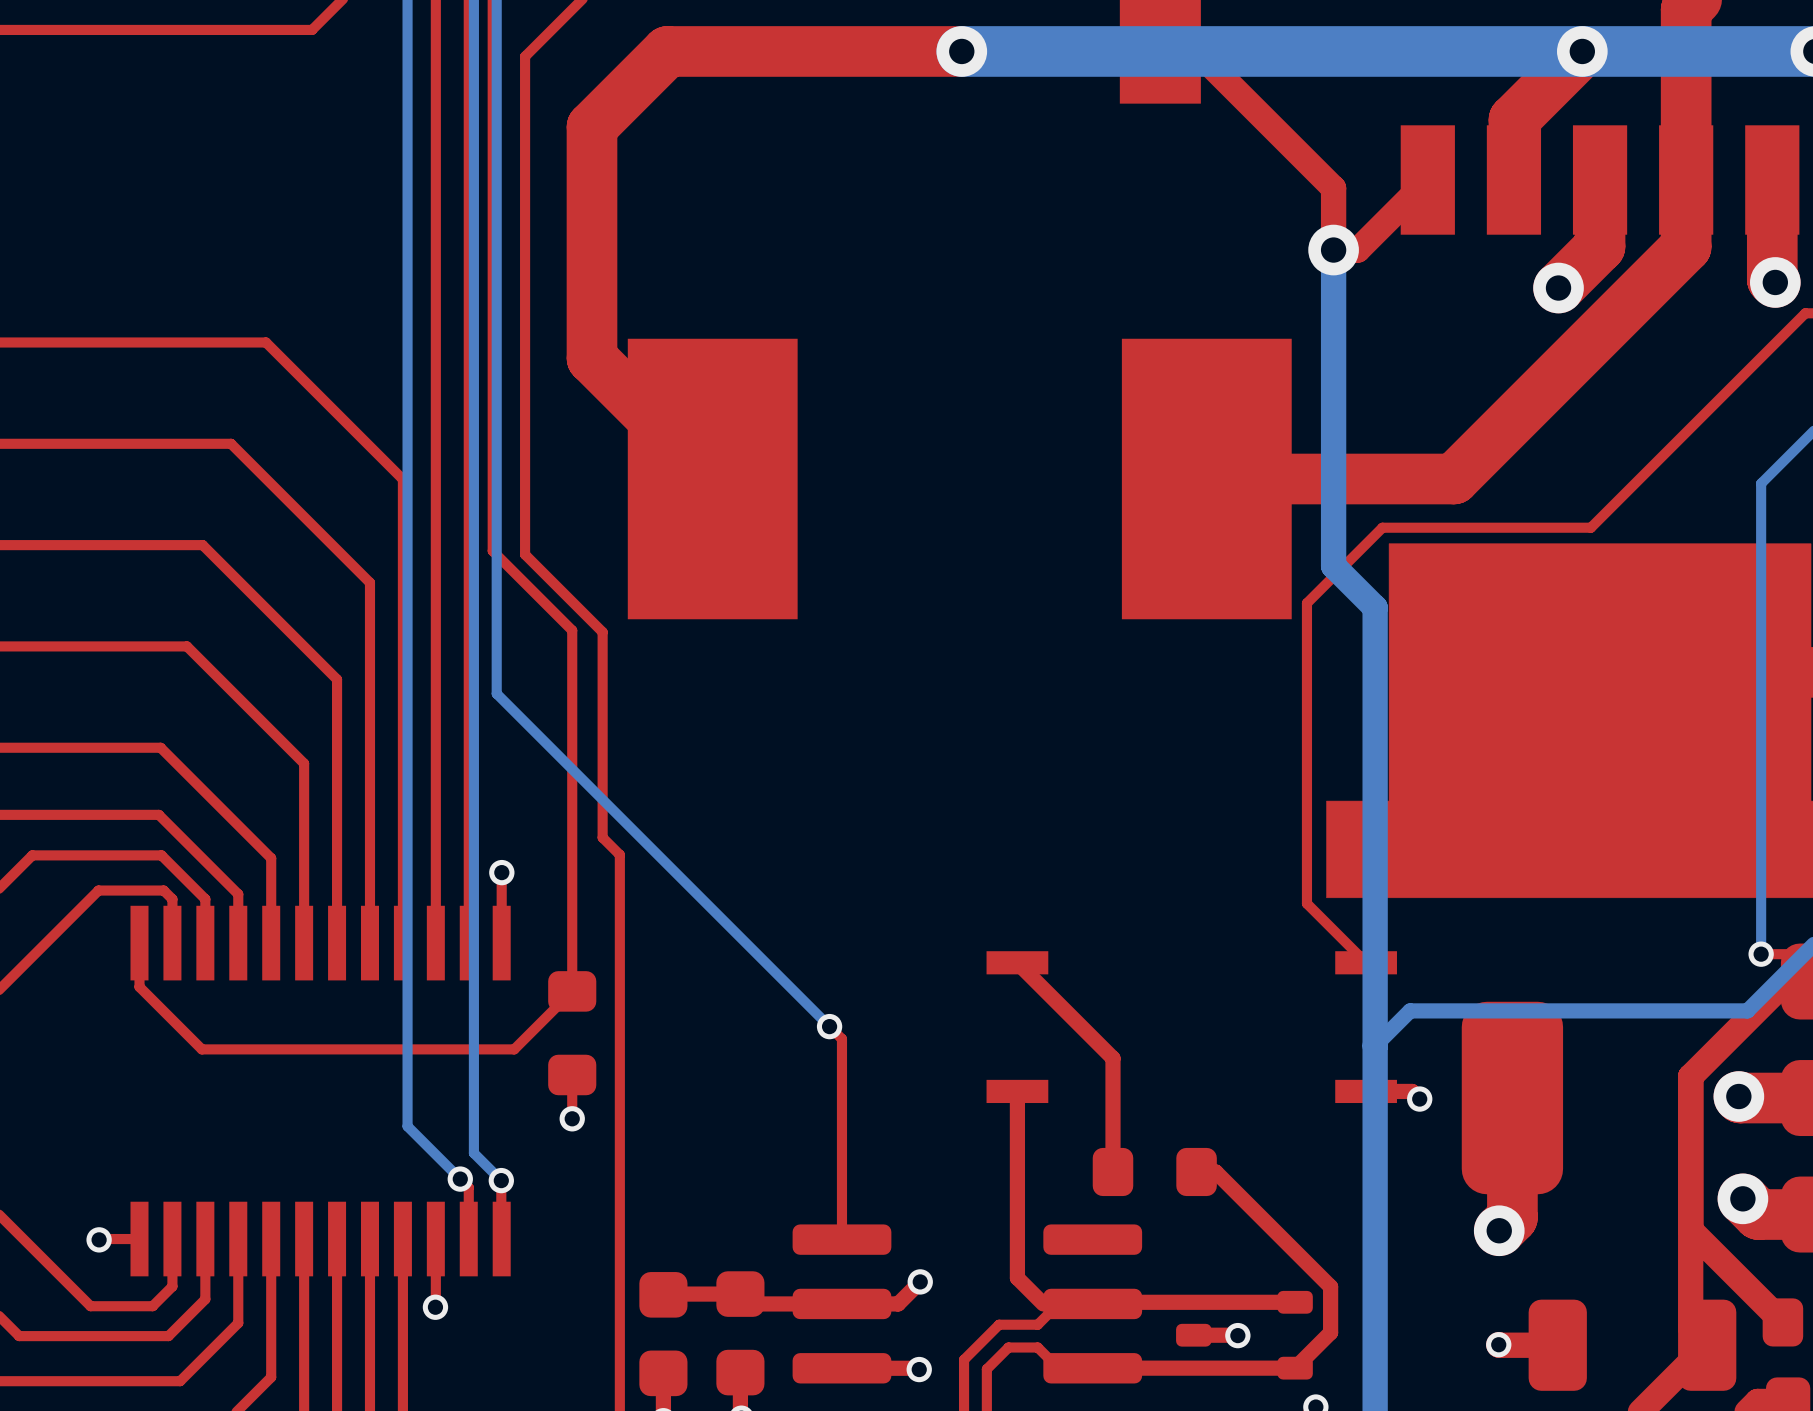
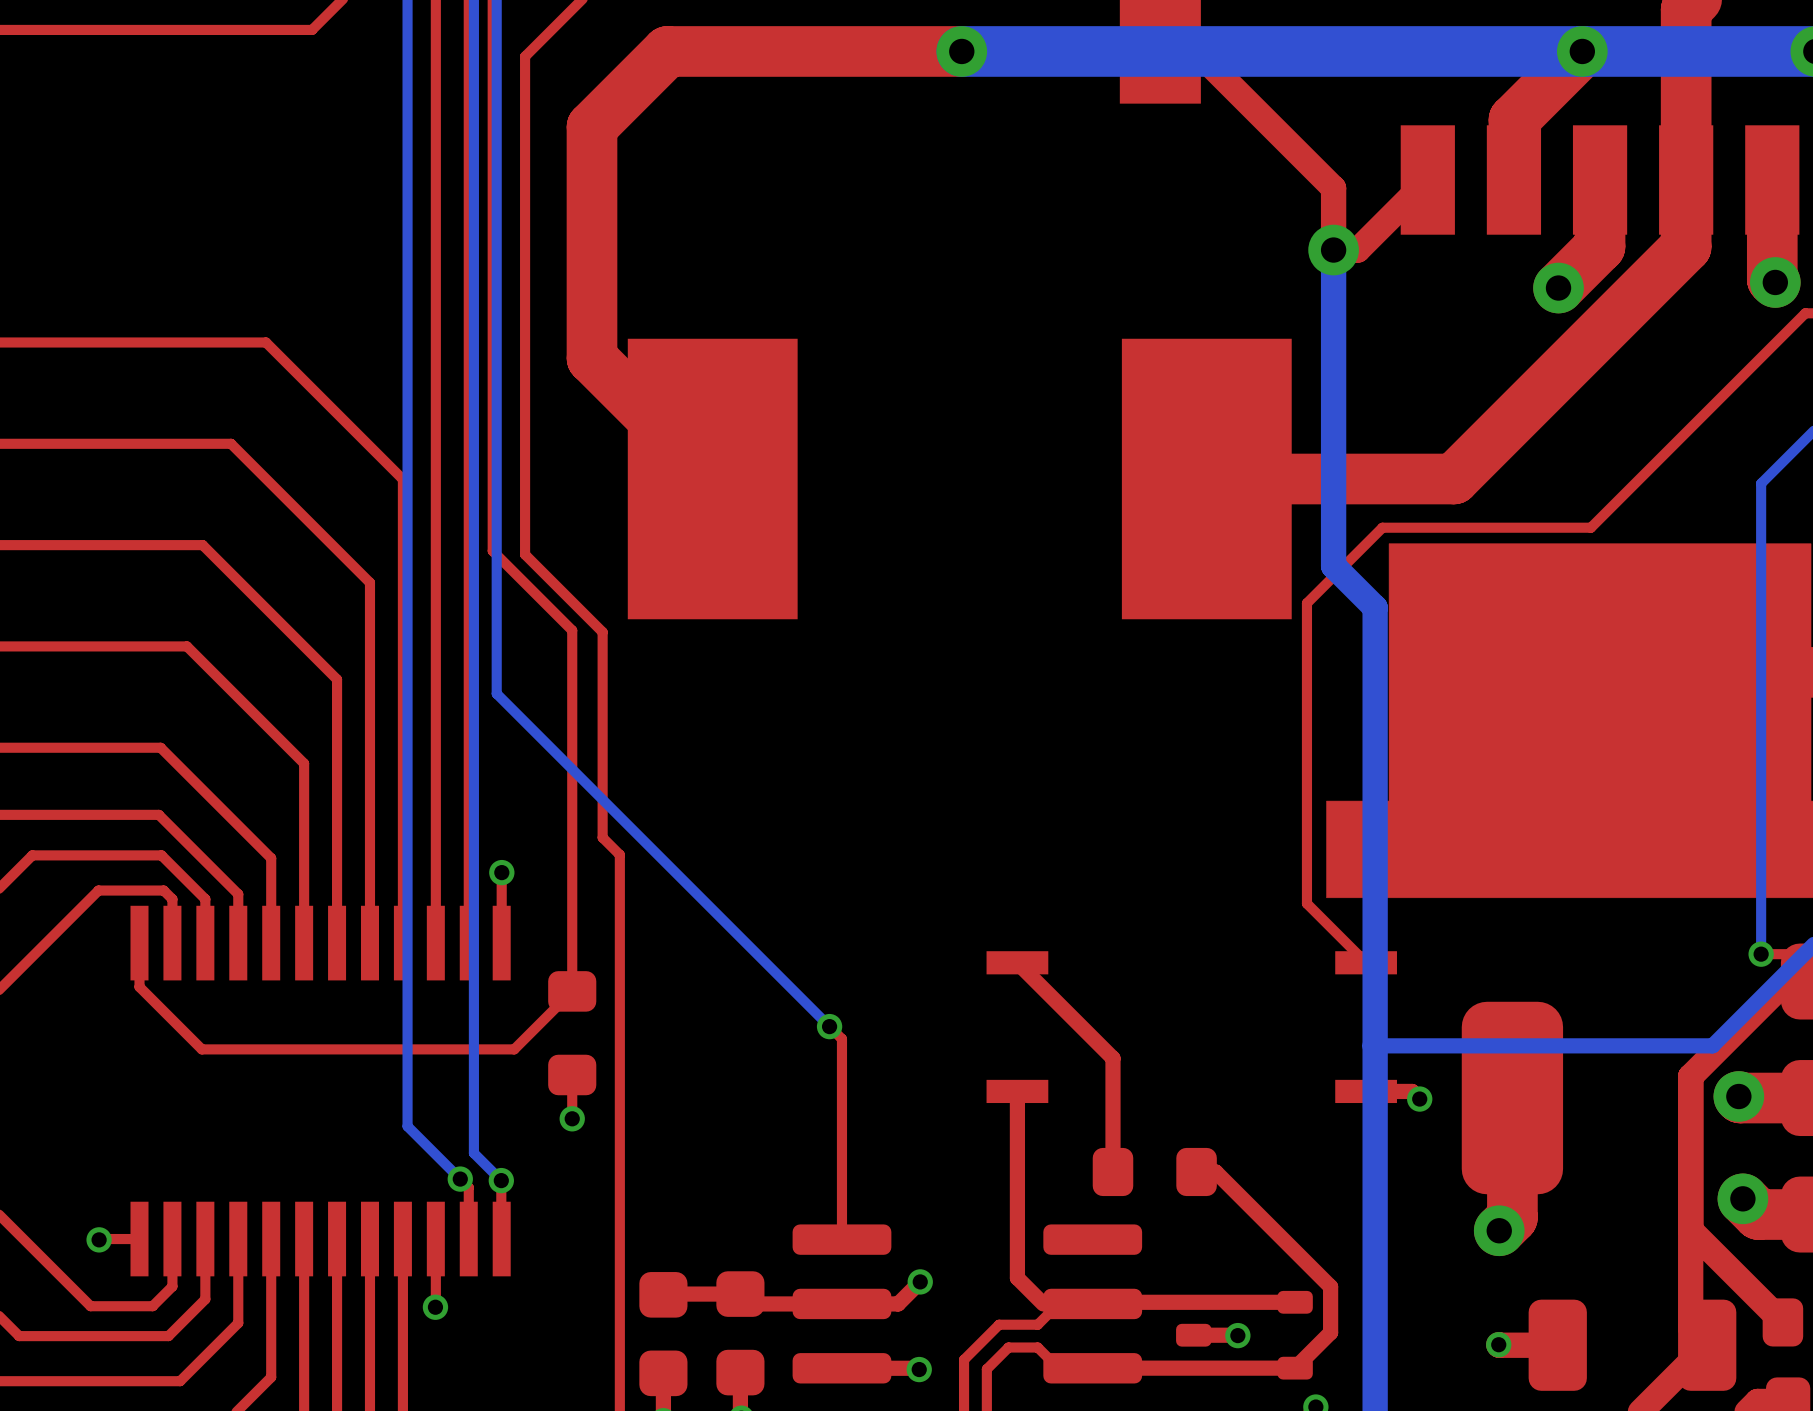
bottom track: (1747, 1010) (1410, 1010) (1375, 1045) -> (1747, 1010) (1712, 1045) (1375, 1045)

